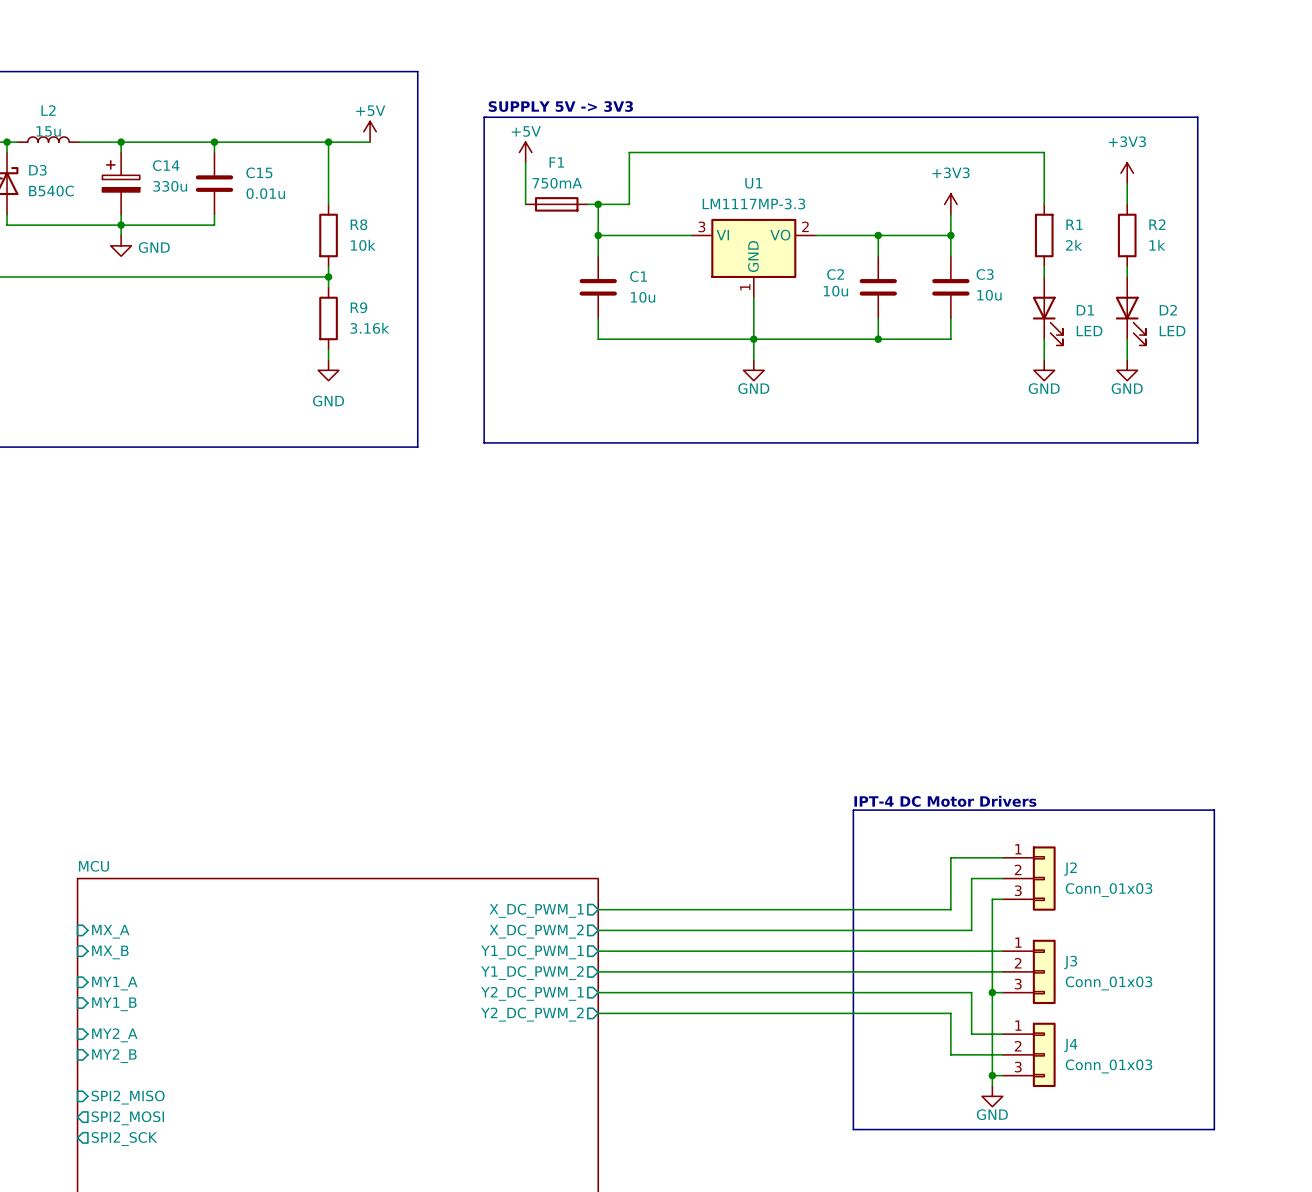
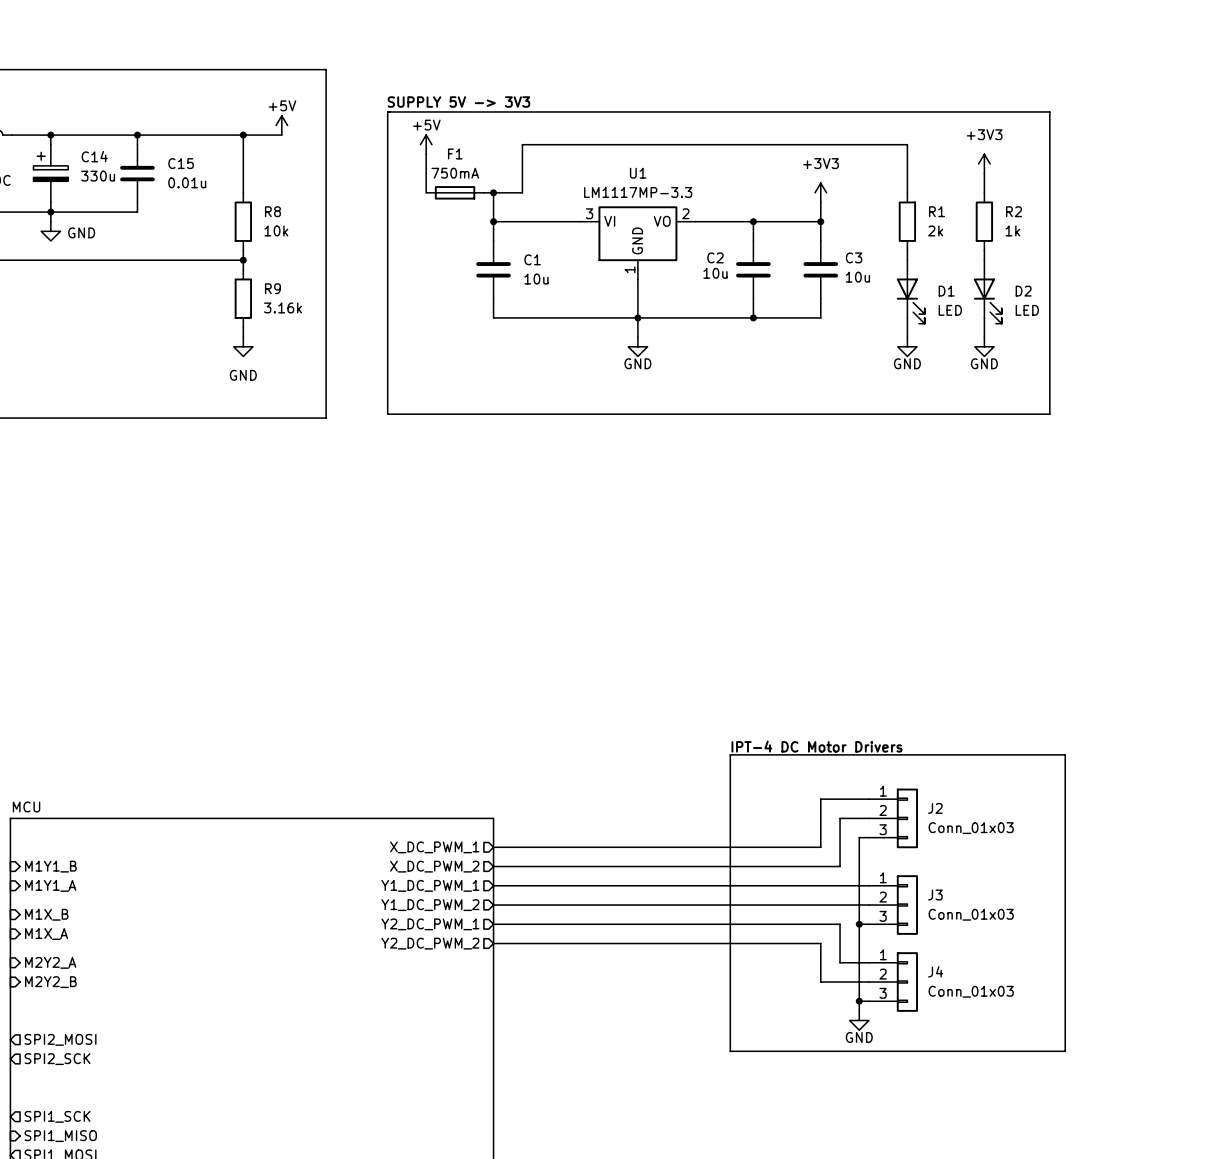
sheet pin: MX_A (110, 931) -> M1Y1_B (50, 866)
sheet pin: MX_B (110, 952) -> M1Y1_A (50, 885)
sheet pin: MY1_A (114, 983) -> M1X_B (46, 914)
sheet pin: MY1_B (114, 1004) -> M1X_A (46, 933)
sheet pin: MY2_A (114, 1035) -> M2Y2_A (50, 962)
sheet pin: MY2_B (114, 1056) -> M2Y2_B (50, 982)
sheet pin: SPI2_MISO (128, 1097) -> none

